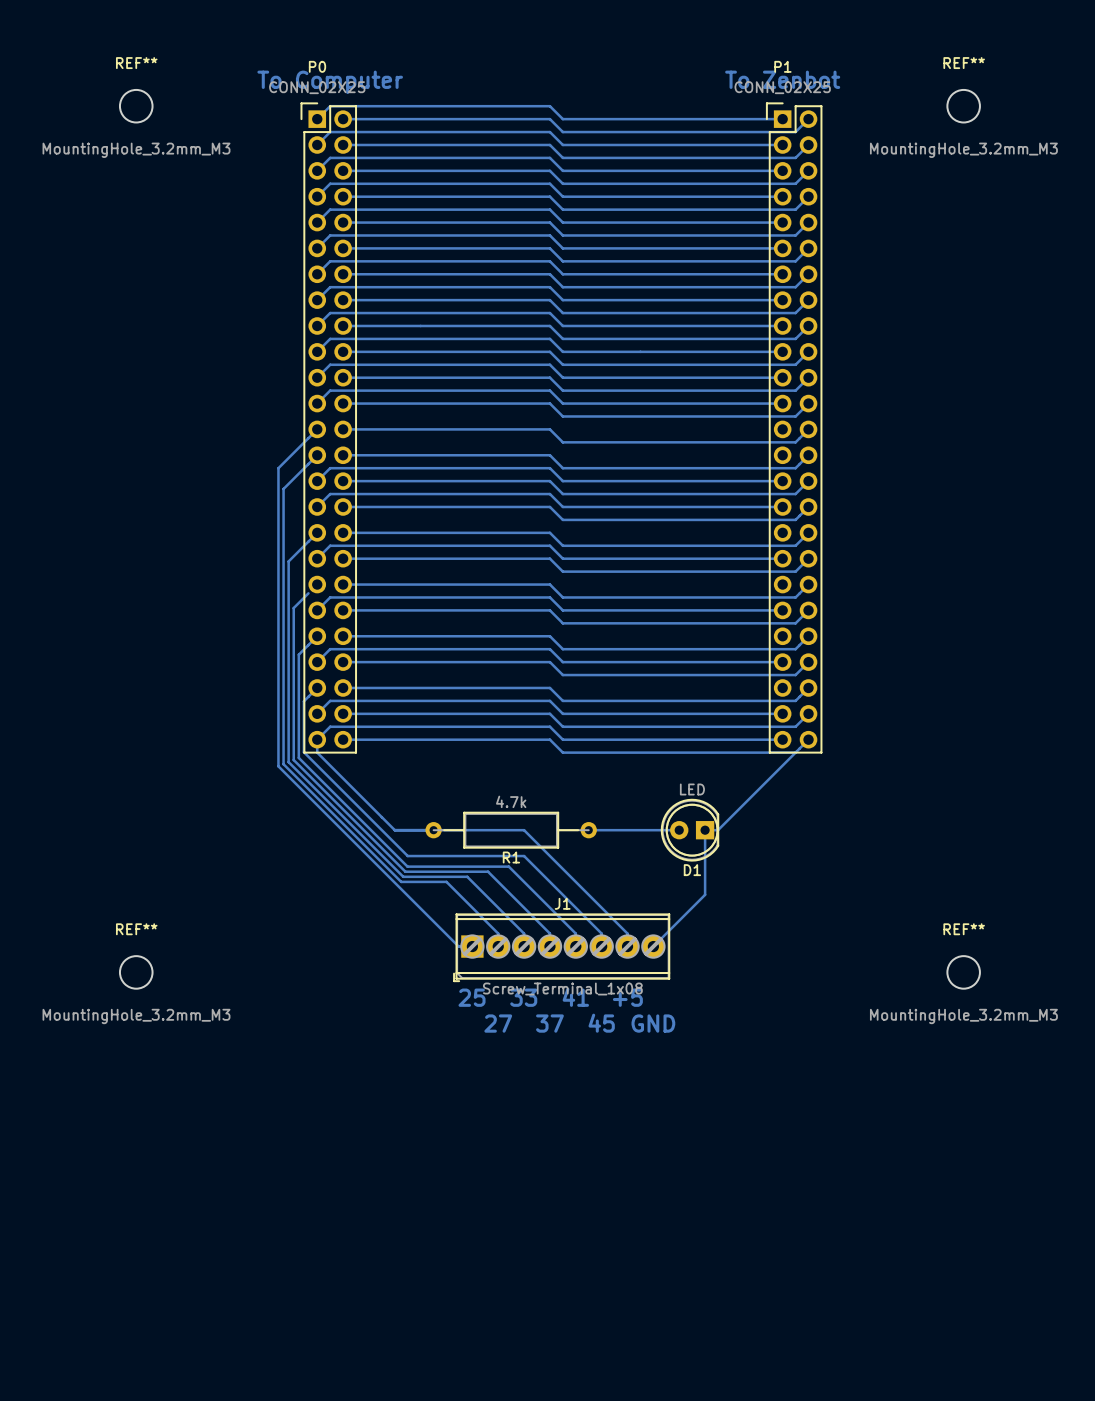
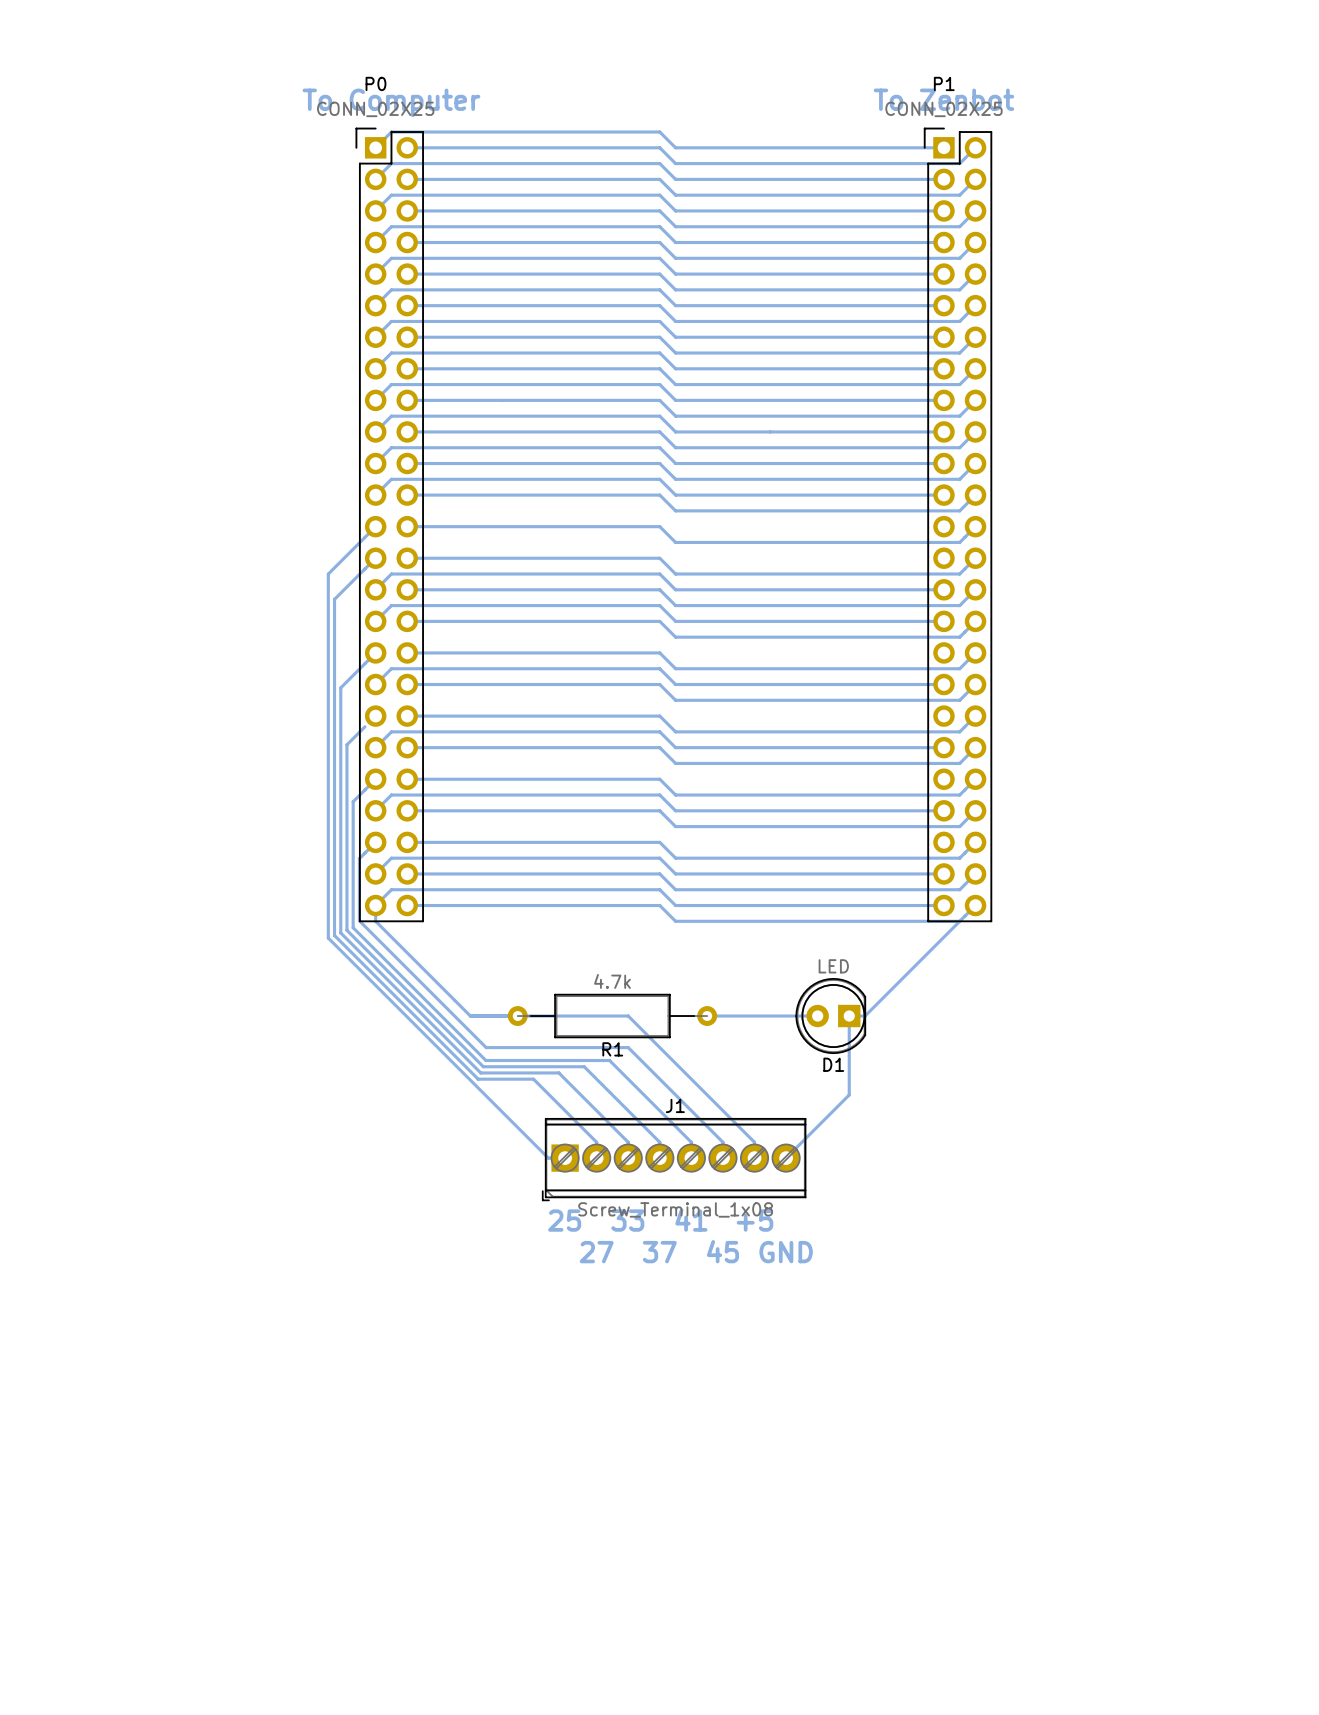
REF**: MountingHole_3.2mm_M3 (136, 106) -> none
REF**: MountingHole_3.2mm_M3 (963, 106) -> none
REF**: MountingHole_3.2mm_M3 (136, 972) -> none
REF**: MountingHole_3.2mm_M3 (963, 972) -> none

